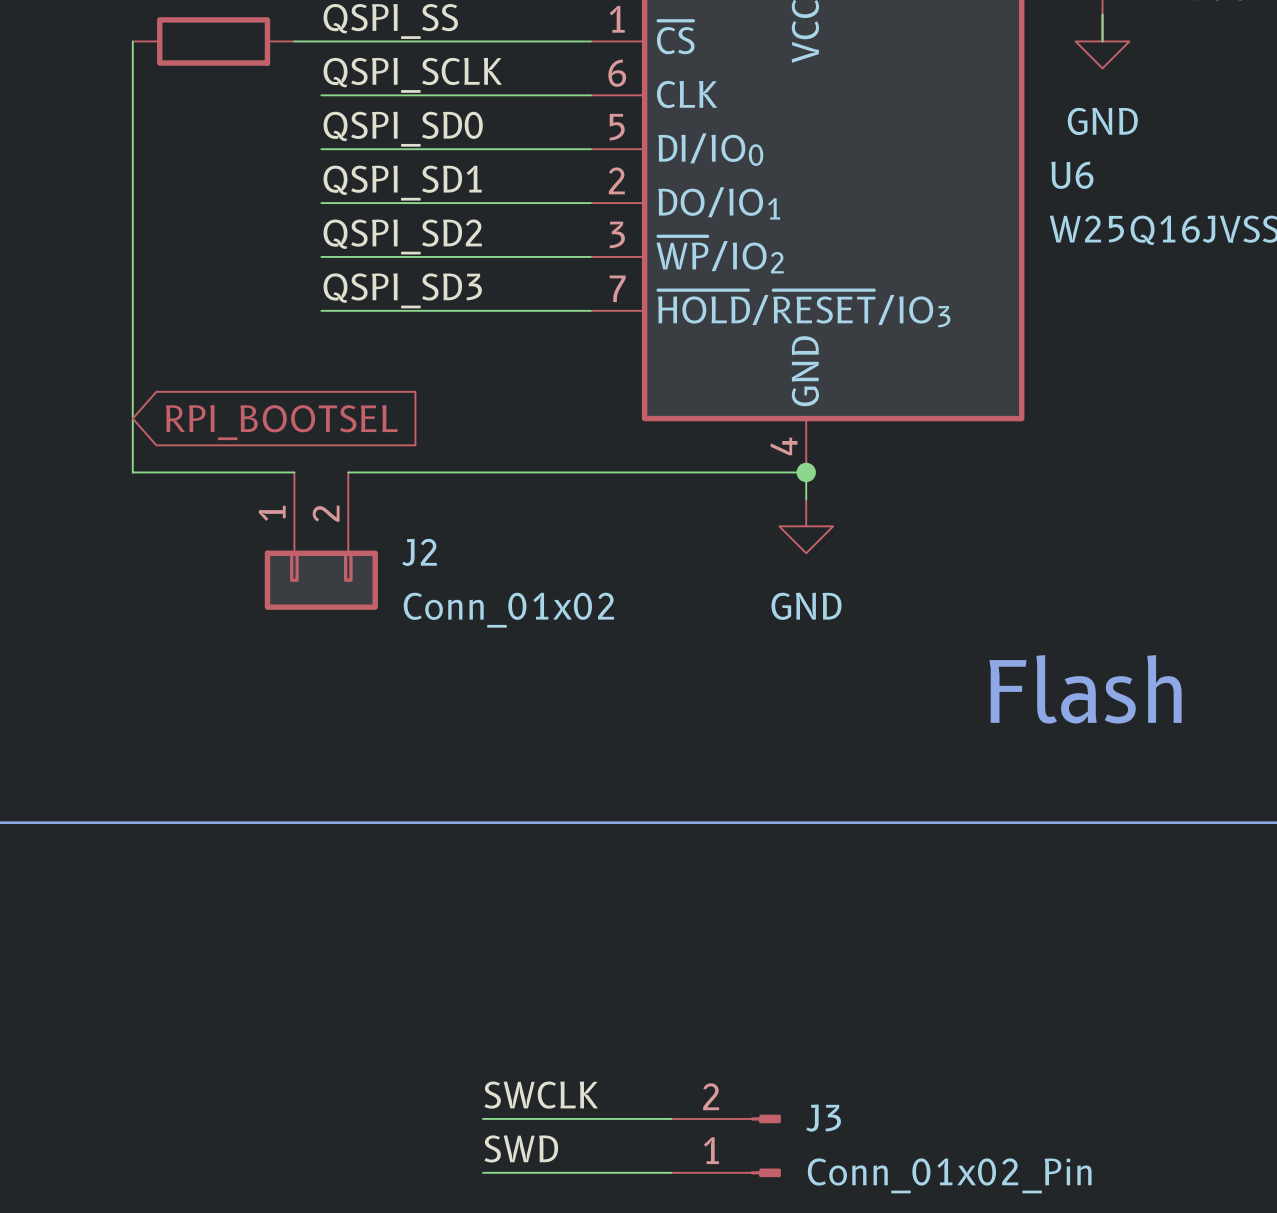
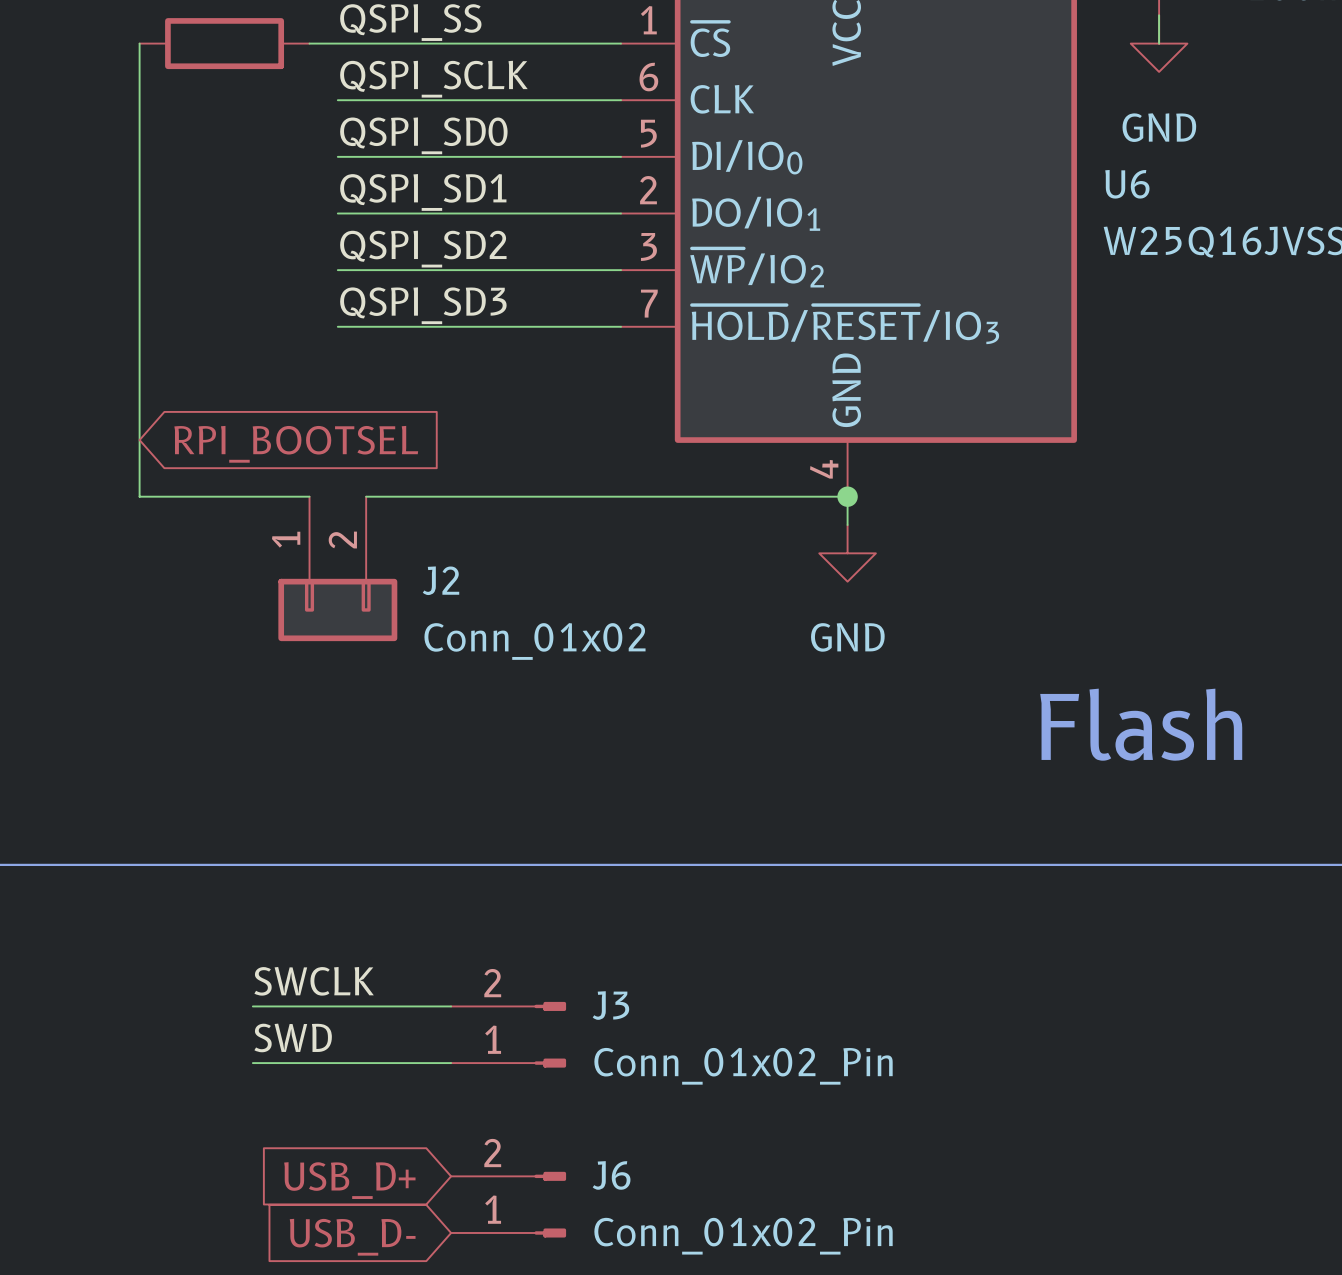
label position: SWCLK (541, 1095) -> SWCLK (314, 981)
wire: (482, 1118) (671, 1118) -> (252, 1006) (451, 1006)
global label: none -> USB_D+ (349, 1180)
J6: none -> Conn_01x02_Pin (508, 1204)
J3 position: (726, 1145) -> (508, 1034)
label position: SWD (521, 1148) -> SWD (293, 1037)
wire: (482, 1172) (671, 1172) -> (252, 1063) (451, 1063)
global label: none -> USB_D- (352, 1237)

